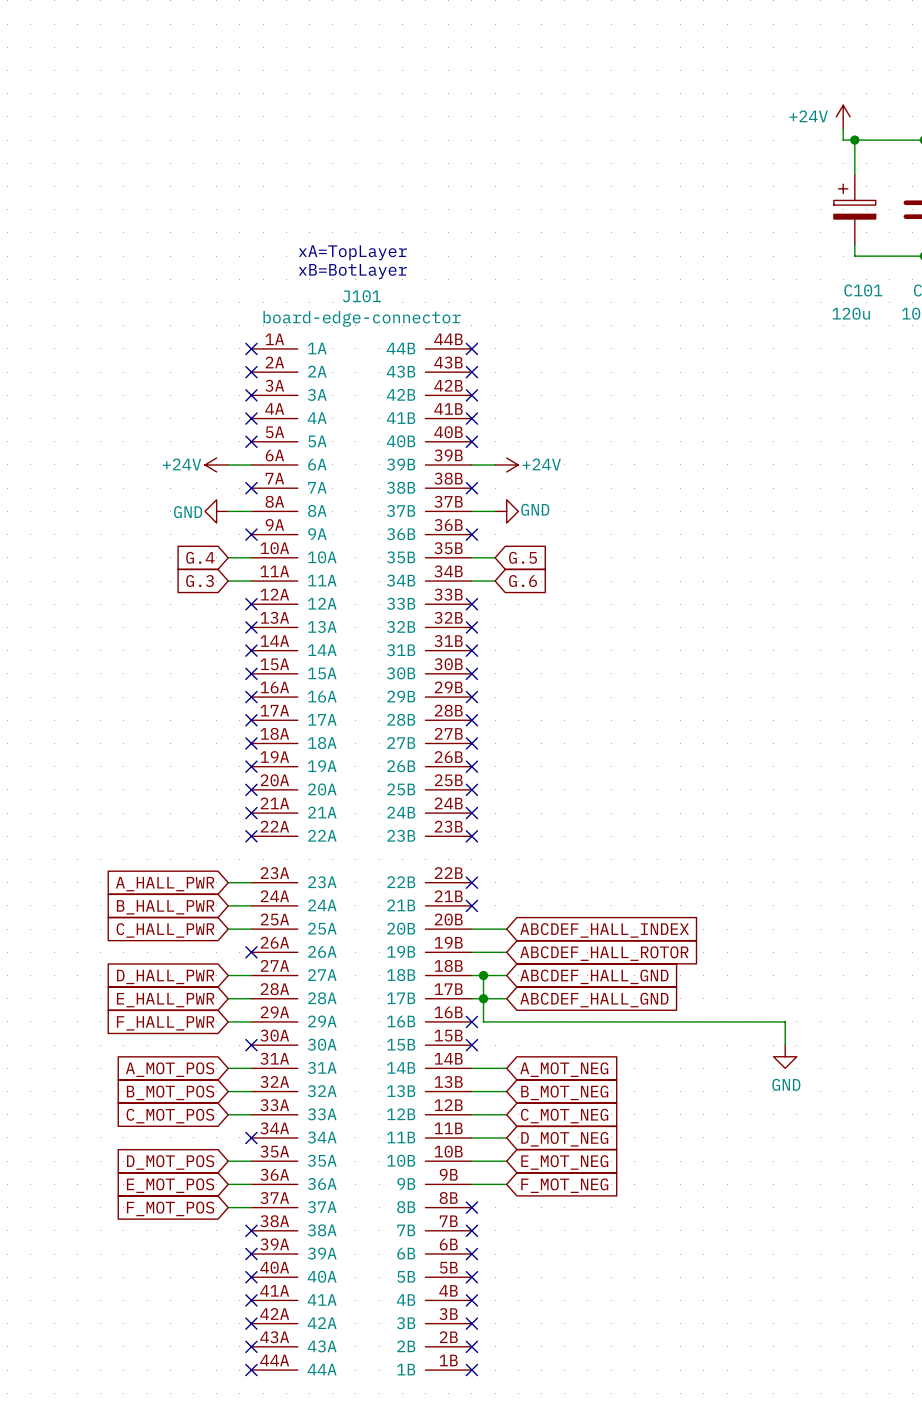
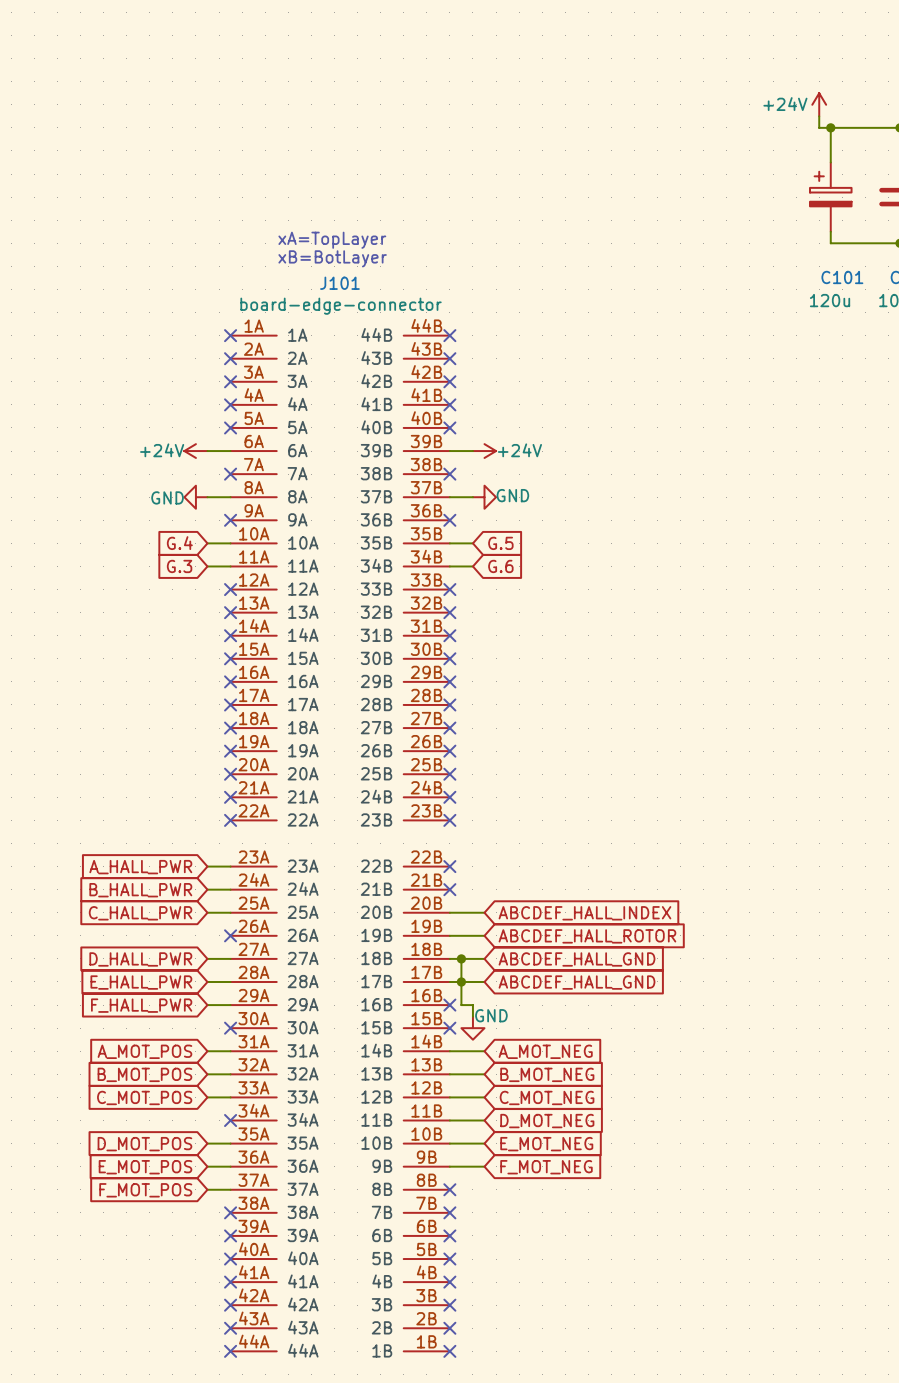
wire: (495, 1021) (785, 1021) (785, 1045) -> (472, 1005) (472, 1016)
power symbol: none -> GND (472, 1028)
power symbol: GND (785, 1056) -> none

